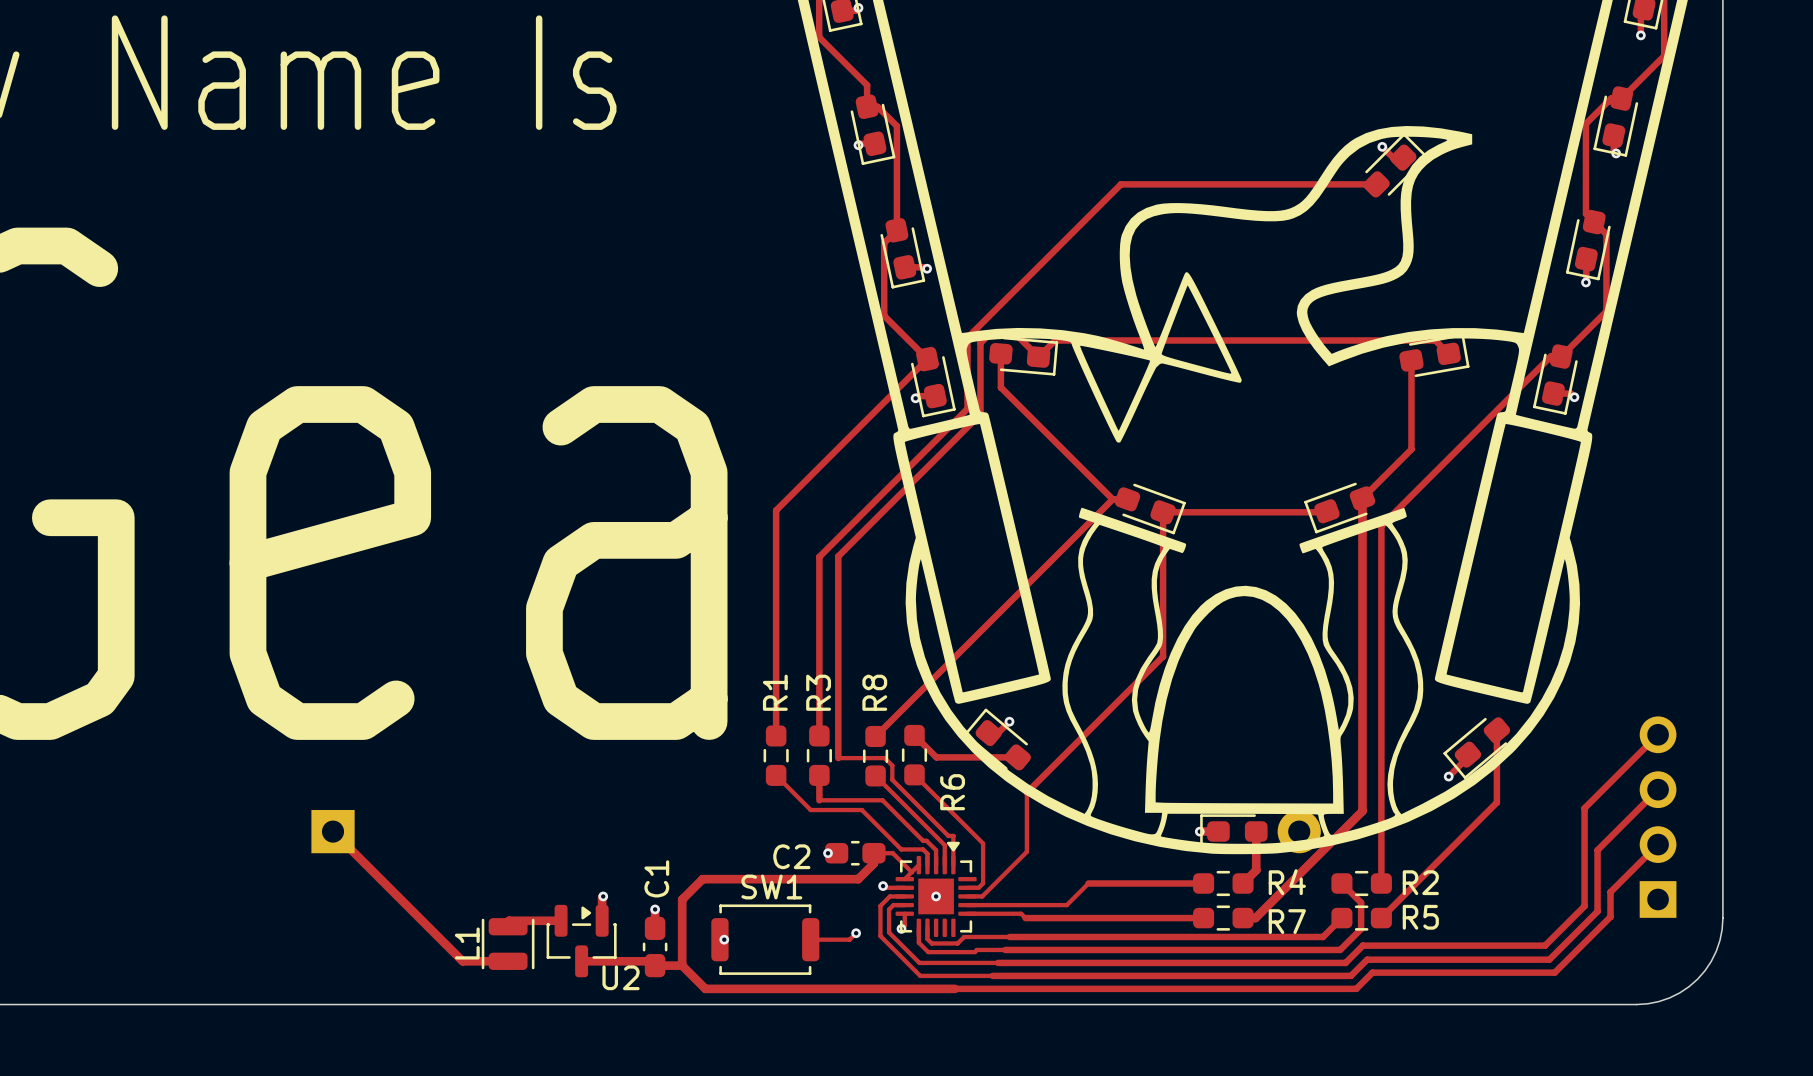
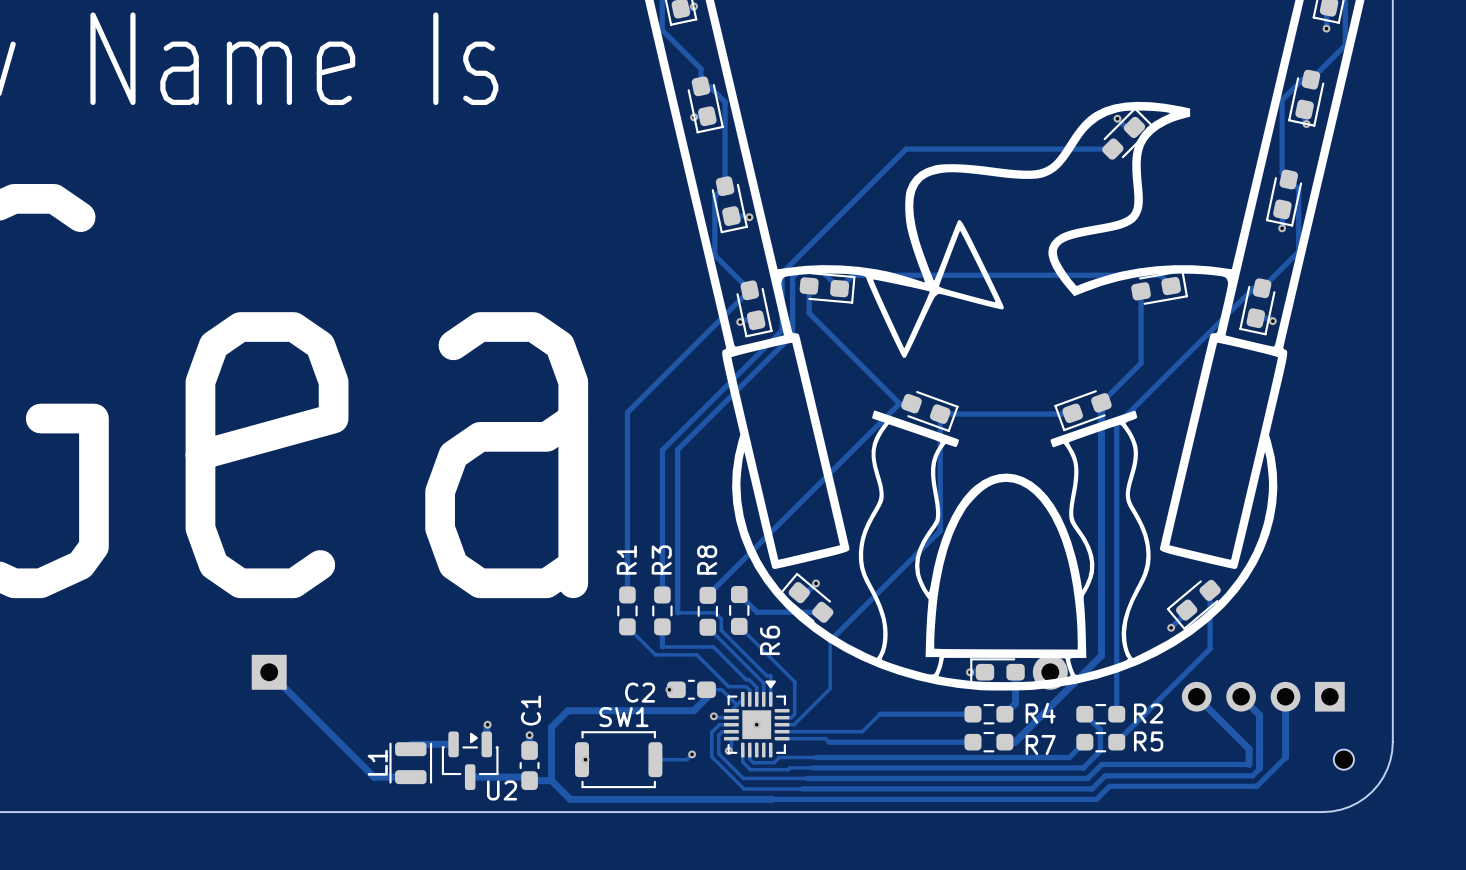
track: (1658, 734) (1584, 808) (1584, 906) (1545, 945) -> (1196, 696) (1249, 749) (1249, 764)
track: (1658, 789) (1597, 850) (1597, 911) (1558, 951) -> (1241, 696) (1259, 715) (1259, 768)
part rotation: 0° (1658, 817) -> 90° counterclockwise (1263, 696)
track: (1658, 844) (1610, 892) (1610, 916) (1590, 937) -> (1285, 696) (1285, 757)
part: none -> (1343, 759)

